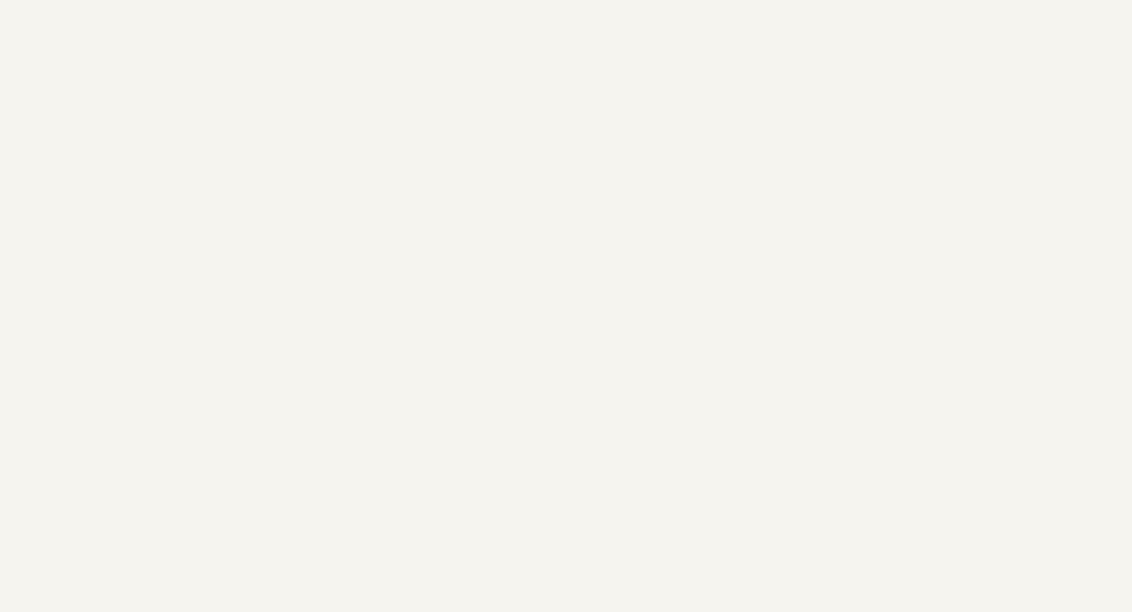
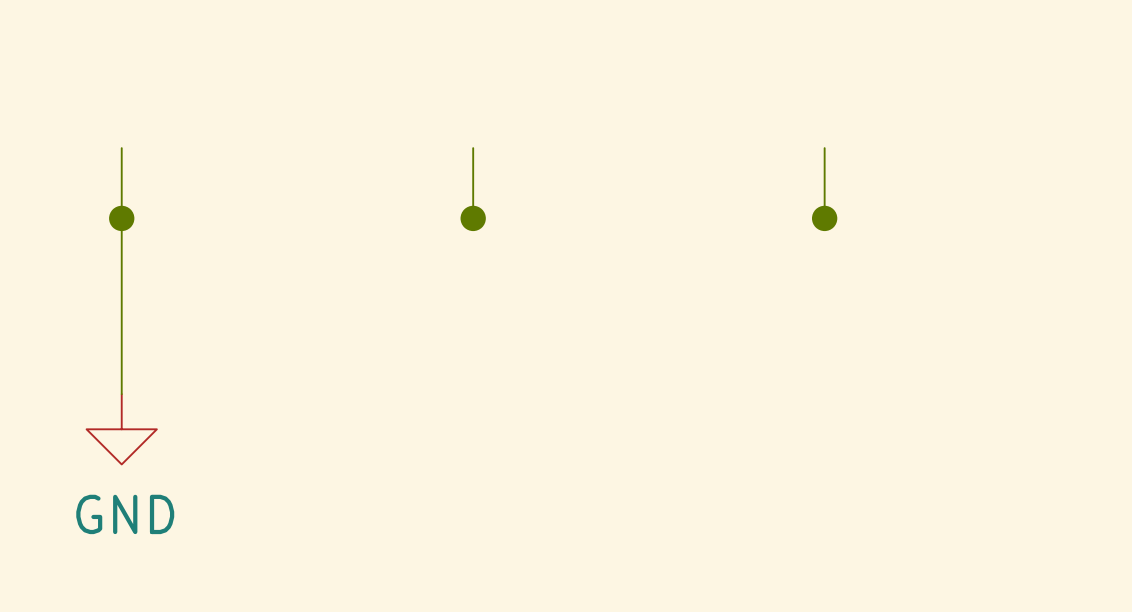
wire: none -> (121, 148) (121, 394)
wire: none -> (473, 148) (473, 218)
wire: none -> (824, 148) (824, 218)
junction: none -> (121, 218)
junction: none -> (473, 218)
junction: none -> (824, 218)
power symbol: none -> GND (121, 429)

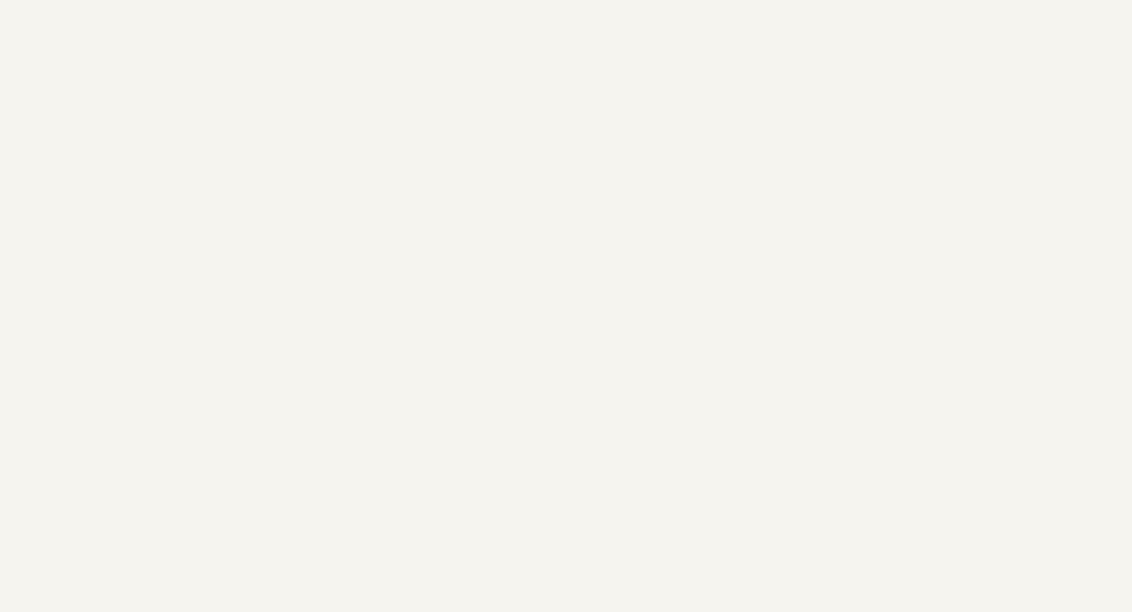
wire: (121, 148) (121, 394) -> none
wire: (473, 148) (473, 218) -> none
wire: (824, 148) (824, 218) -> none
junction: (121, 218) -> none
junction: (473, 218) -> none
junction: (824, 218) -> none
power symbol: GND (121, 429) -> none

